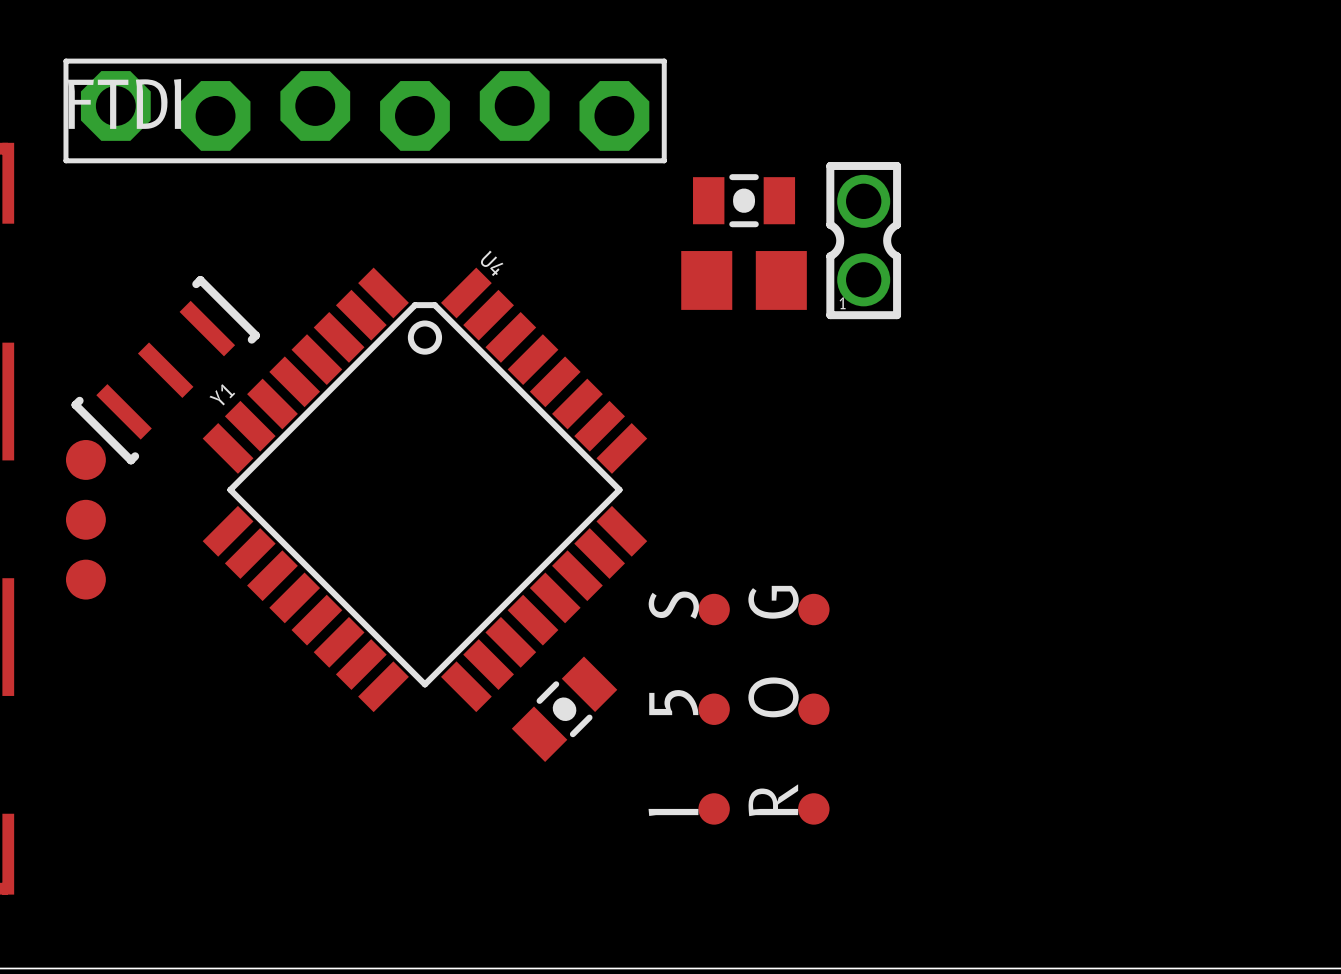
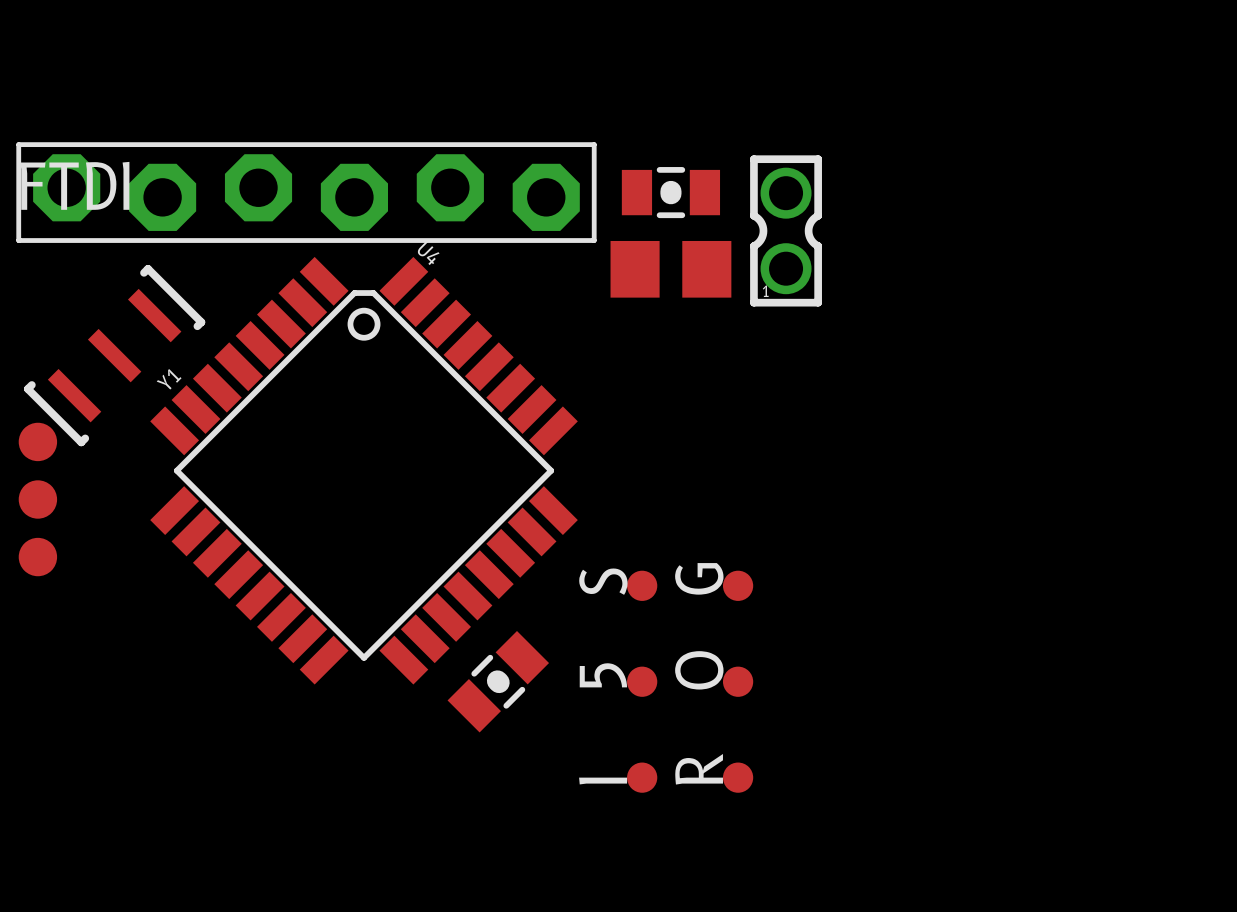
FTDI position: (365, 110) -> (306, 192)

